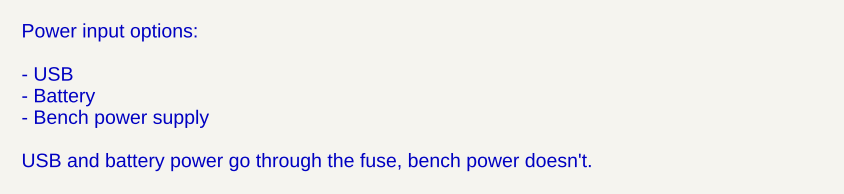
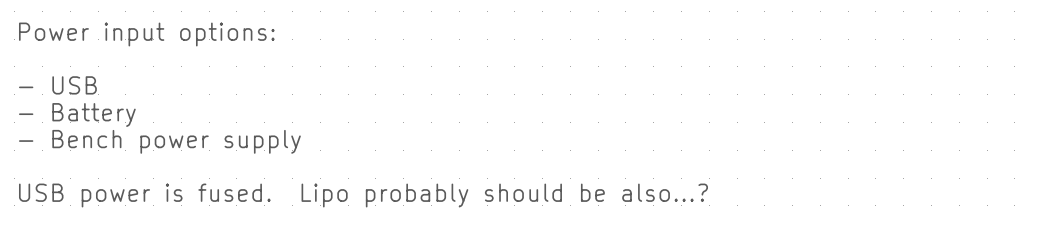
text: USB and battery power go through the fuse, bench power doesn't. (306, 162) -> USB power is fused. Lipo probably should be also...? (363, 195)

